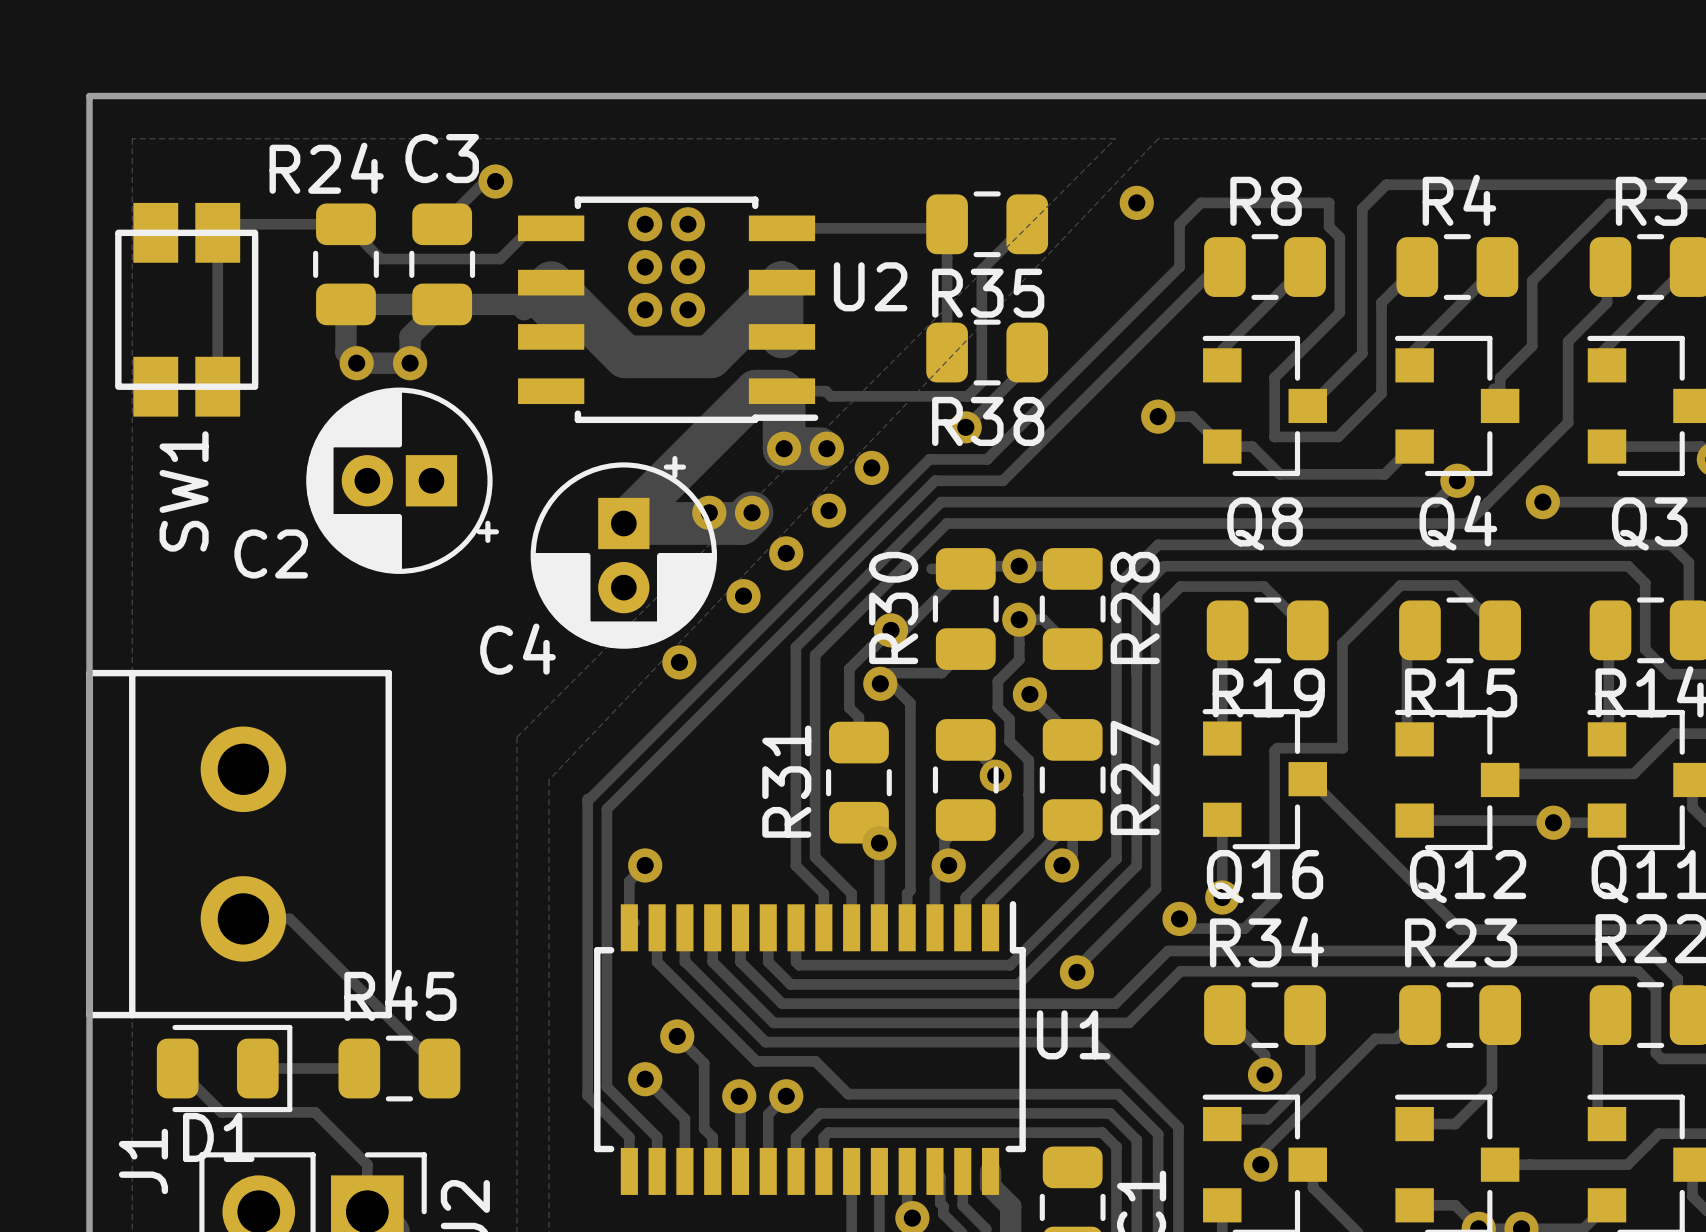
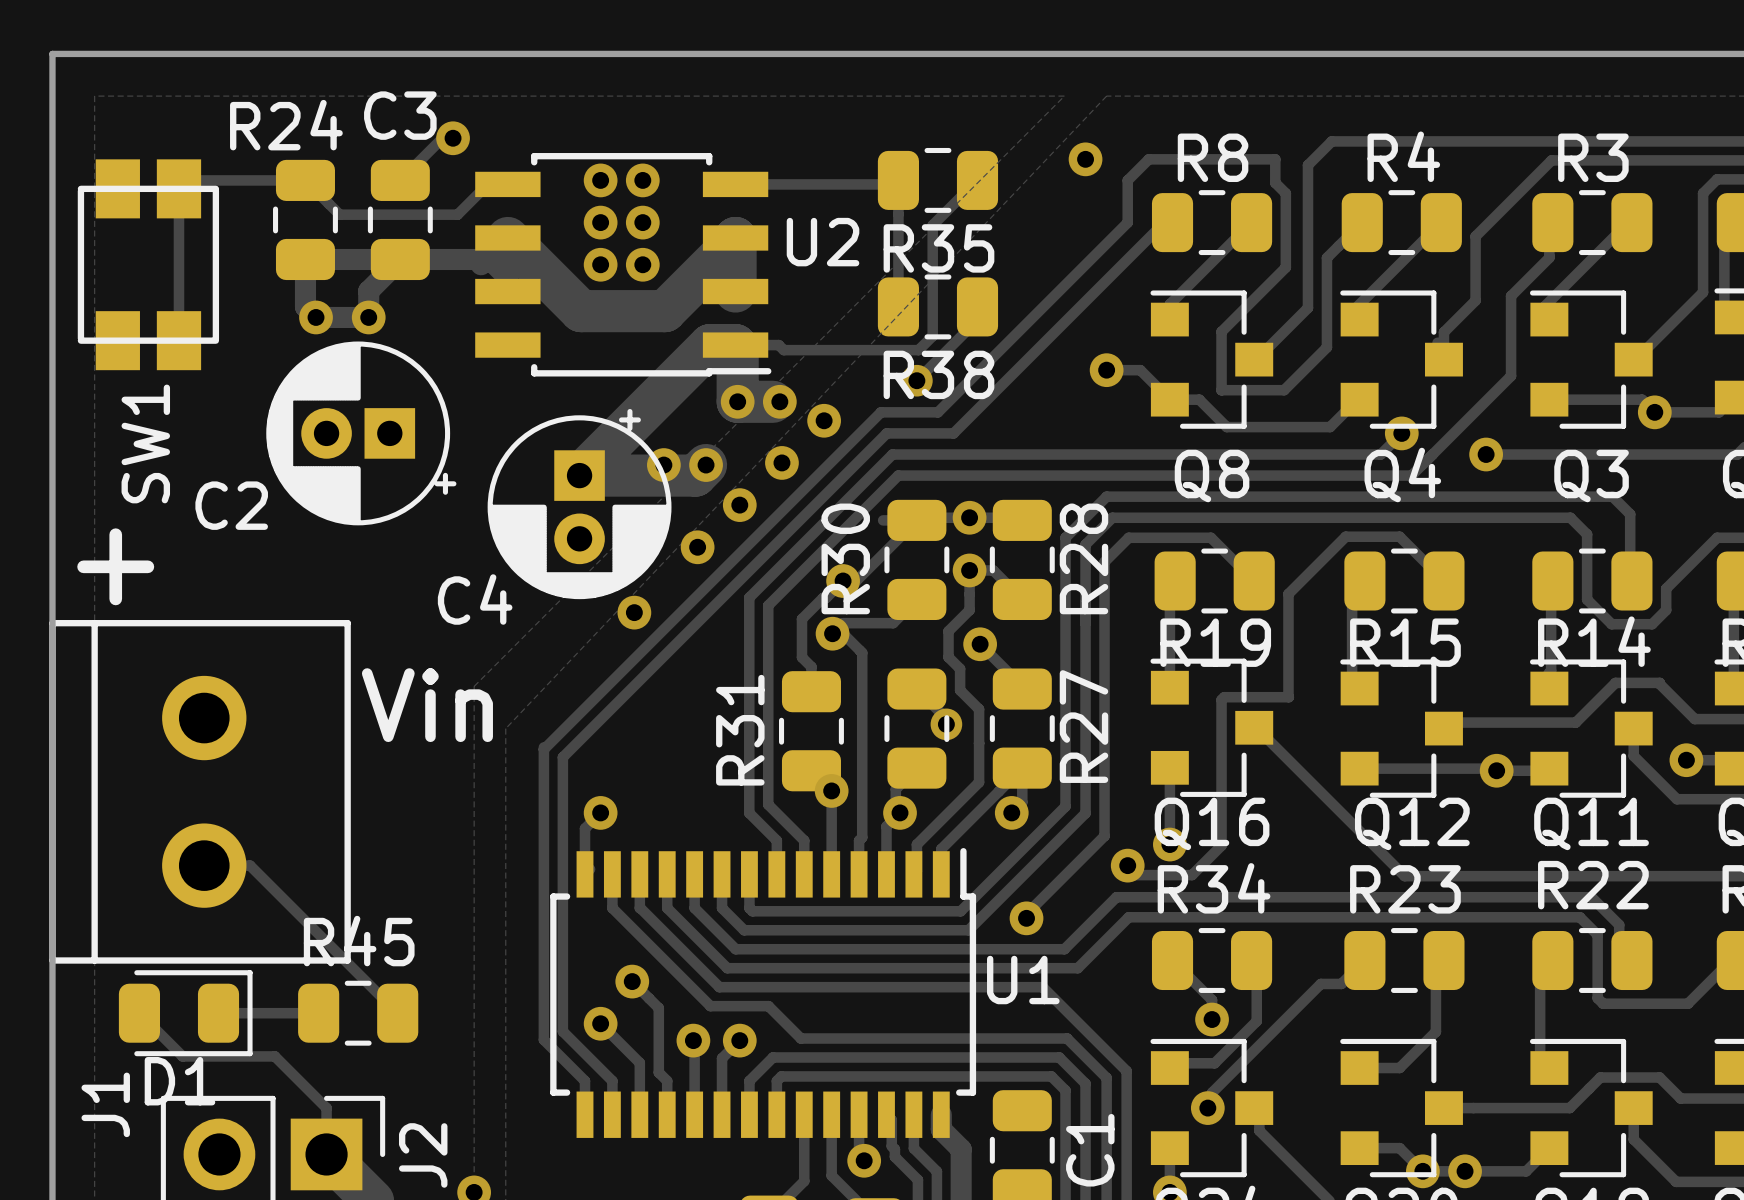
text: none -> + (115, 566)
text: none -> Vin (427, 705)

